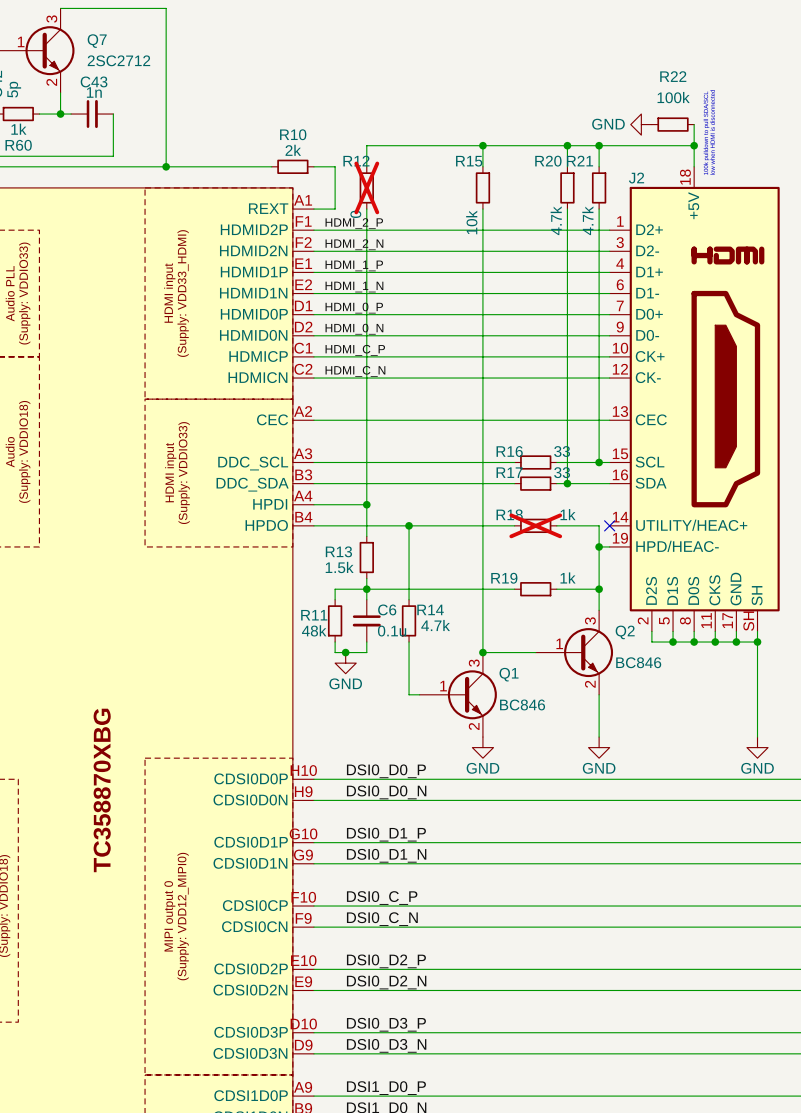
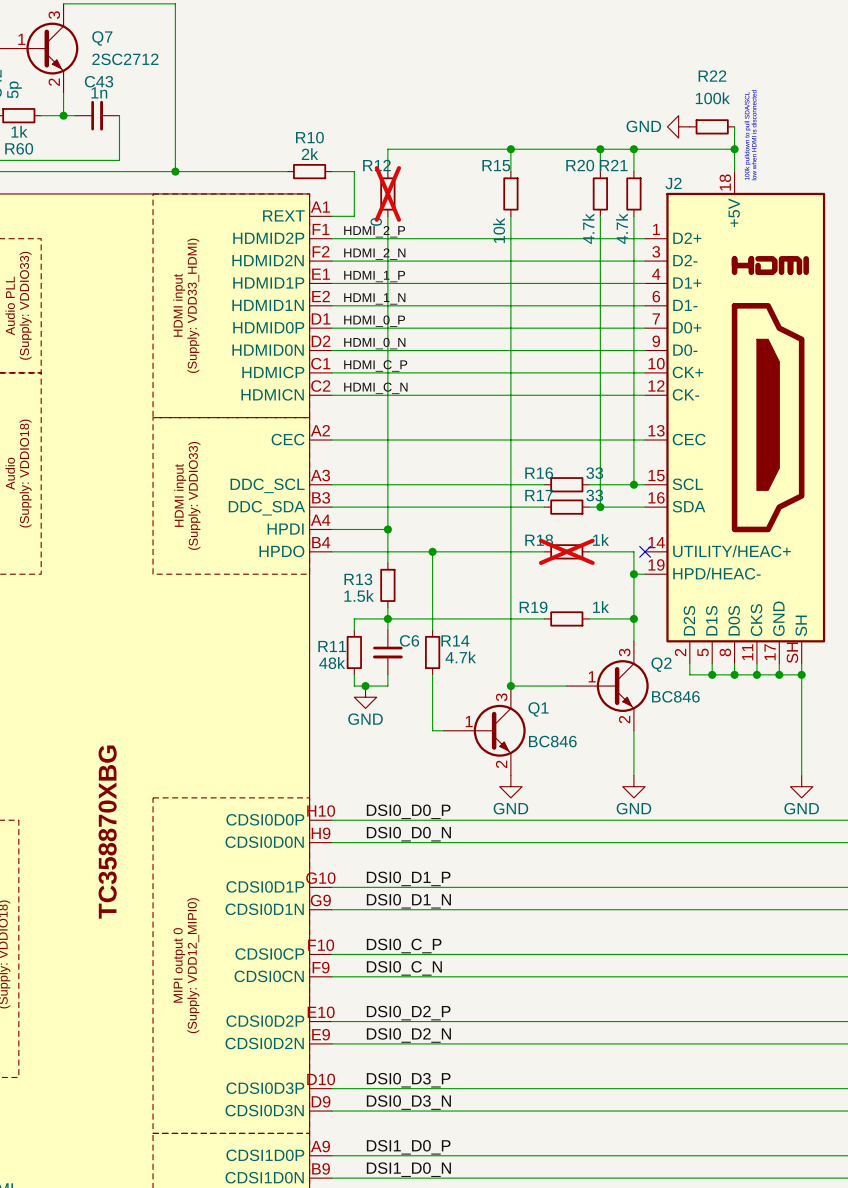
C6 value: 0.1u (392, 631) -> none

